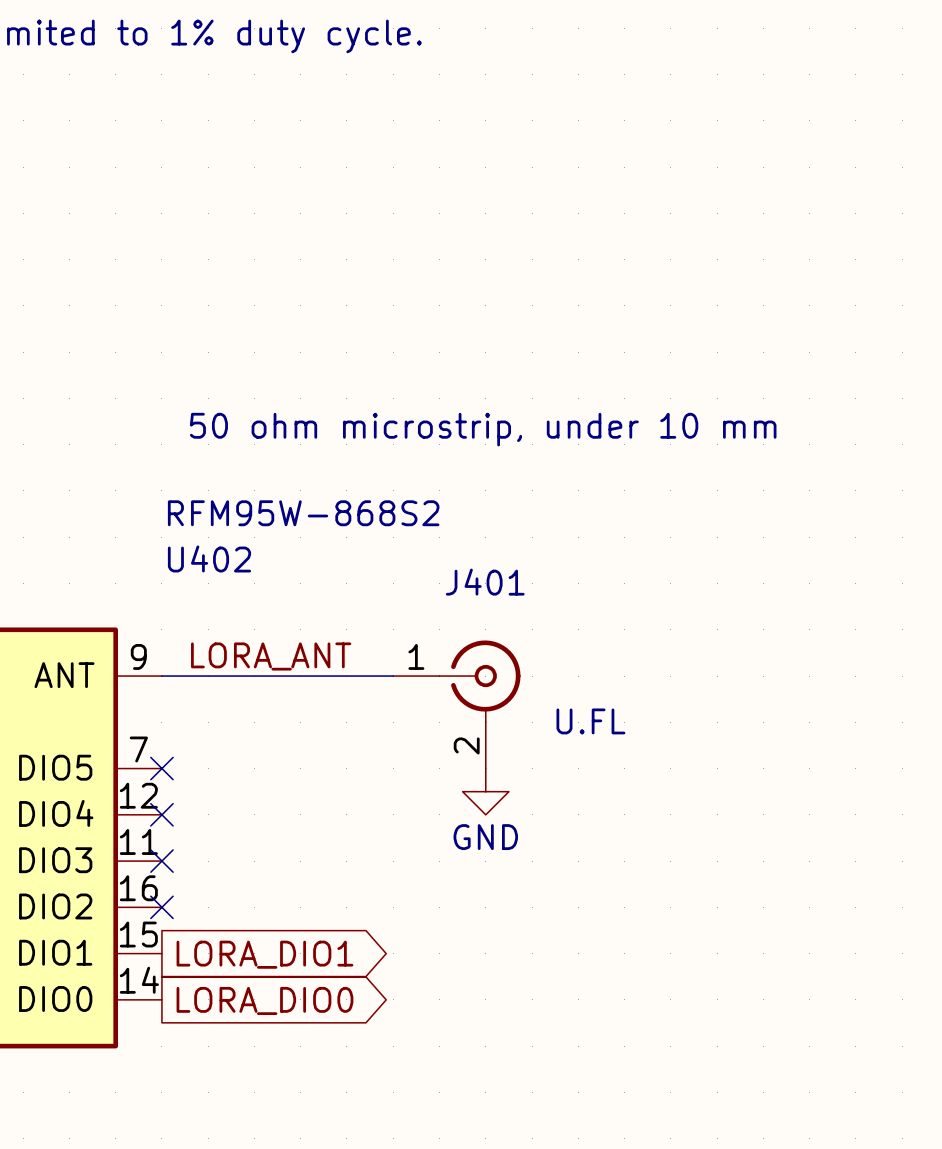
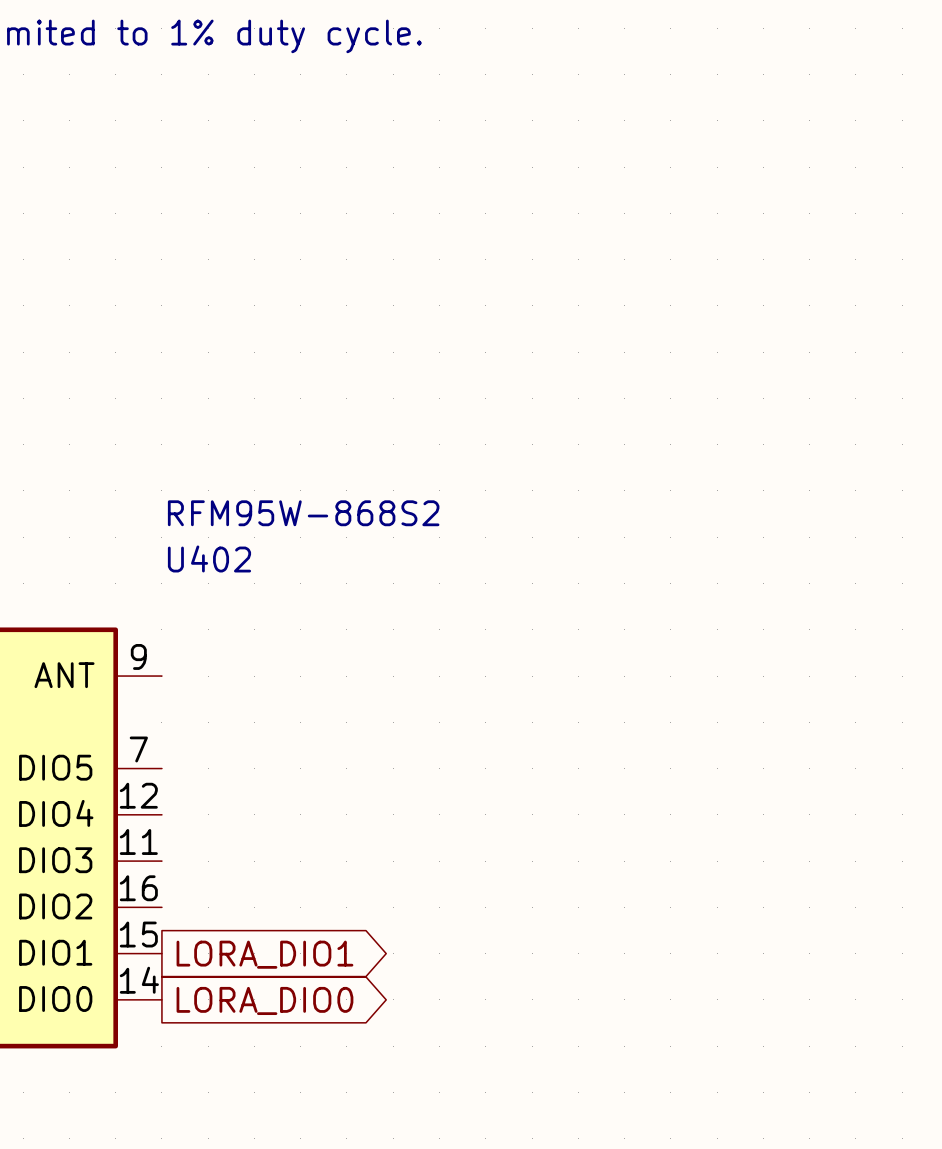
text: 50 ohm microstrip, under 10 mm (483, 429) -> none
label: LORA_ANT (271, 656) -> none
wire: (161, 676) (393, 676) -> none
J401: U.FL (456, 704) -> none
no-connect mark: (161, 768) -> none
power symbol: GND (485, 791) -> none
no-connect mark: (161, 814) -> none
no-connect mark: (161, 861) -> none
no-connect mark: (161, 907) -> none

